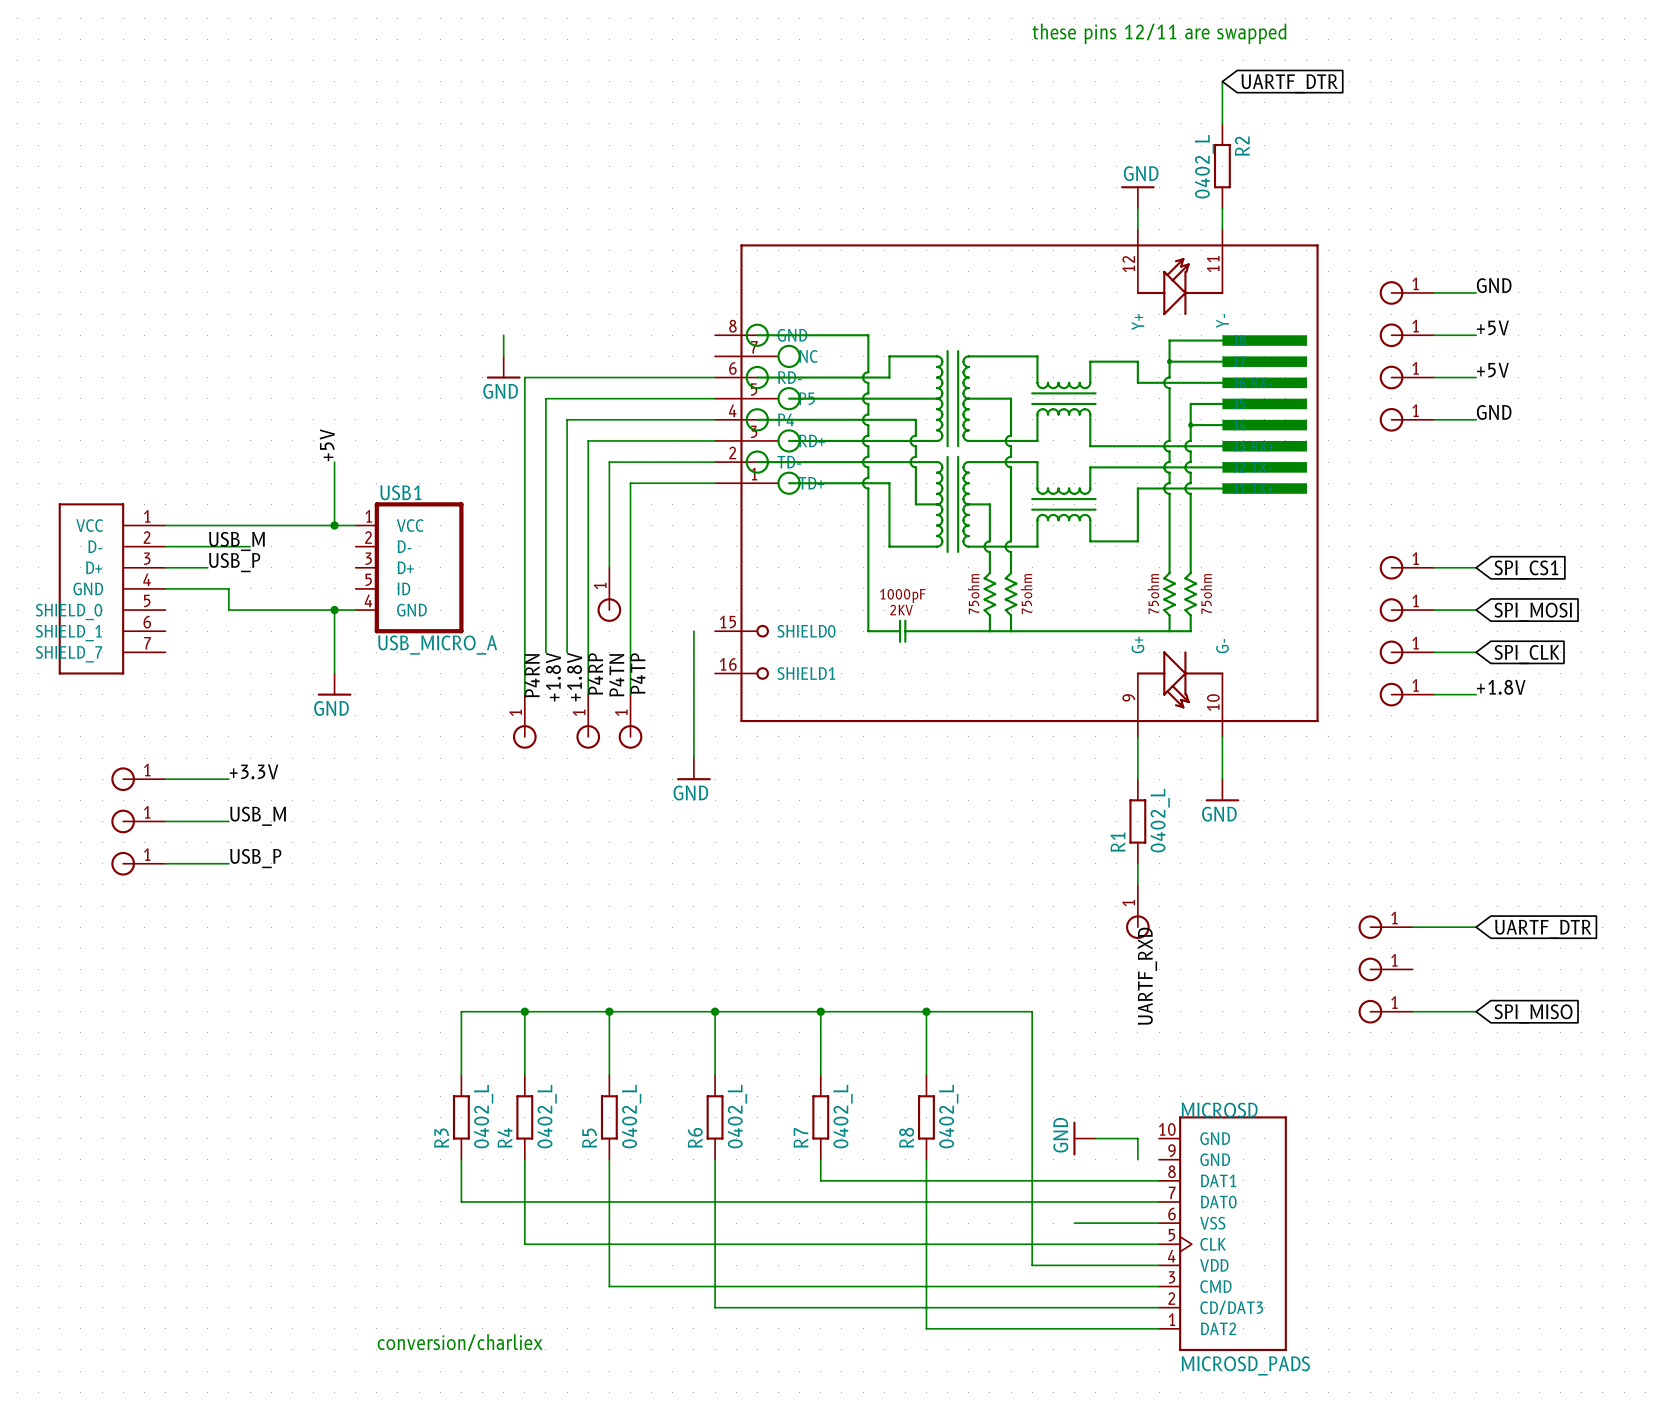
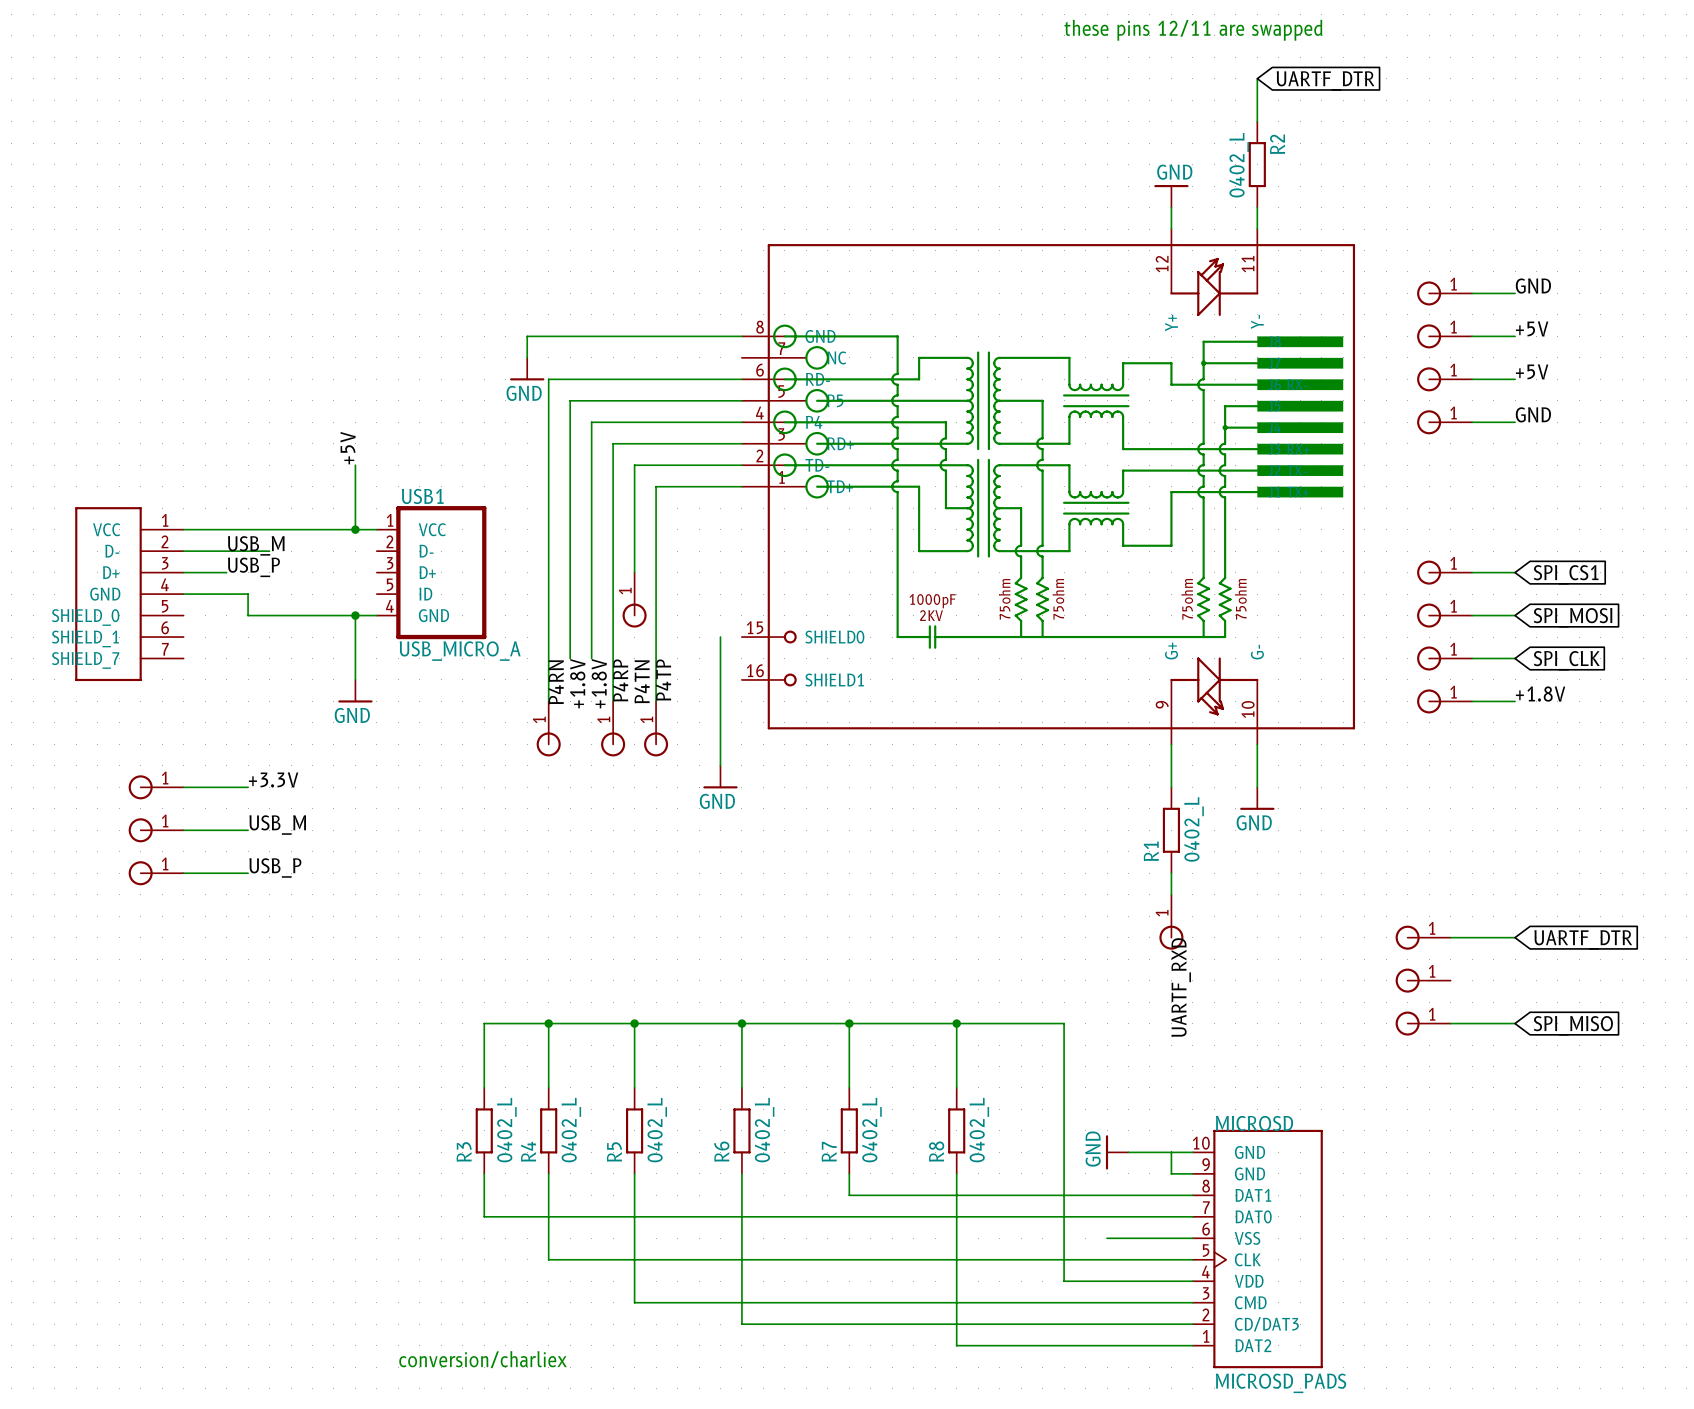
wire: none -> (527, 336) (741, 336)
wire: none -> (1171, 1152) (1192, 1152)
wire: none -> (1171, 1173) (1192, 1173)

